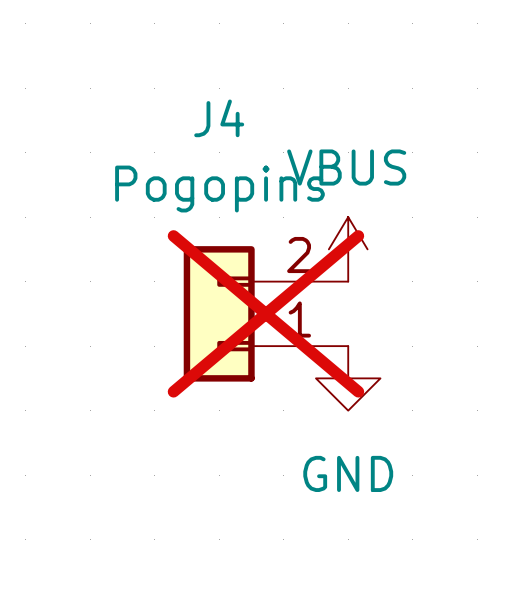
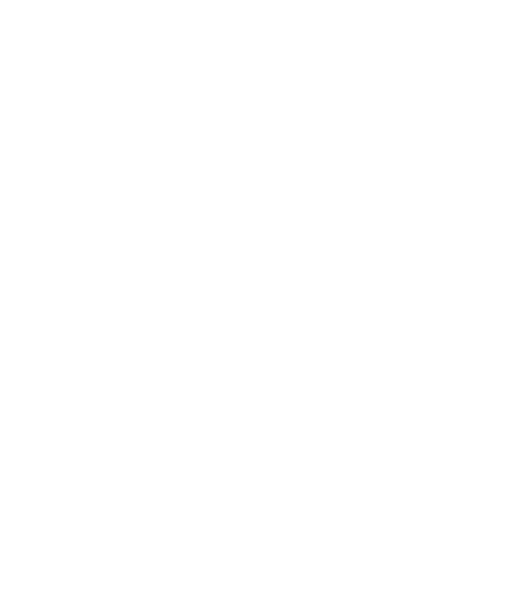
power symbol: VBUS (348, 249) -> none
J4: Pogopins (265, 313) -> none
power symbol: GND (348, 378) -> none

